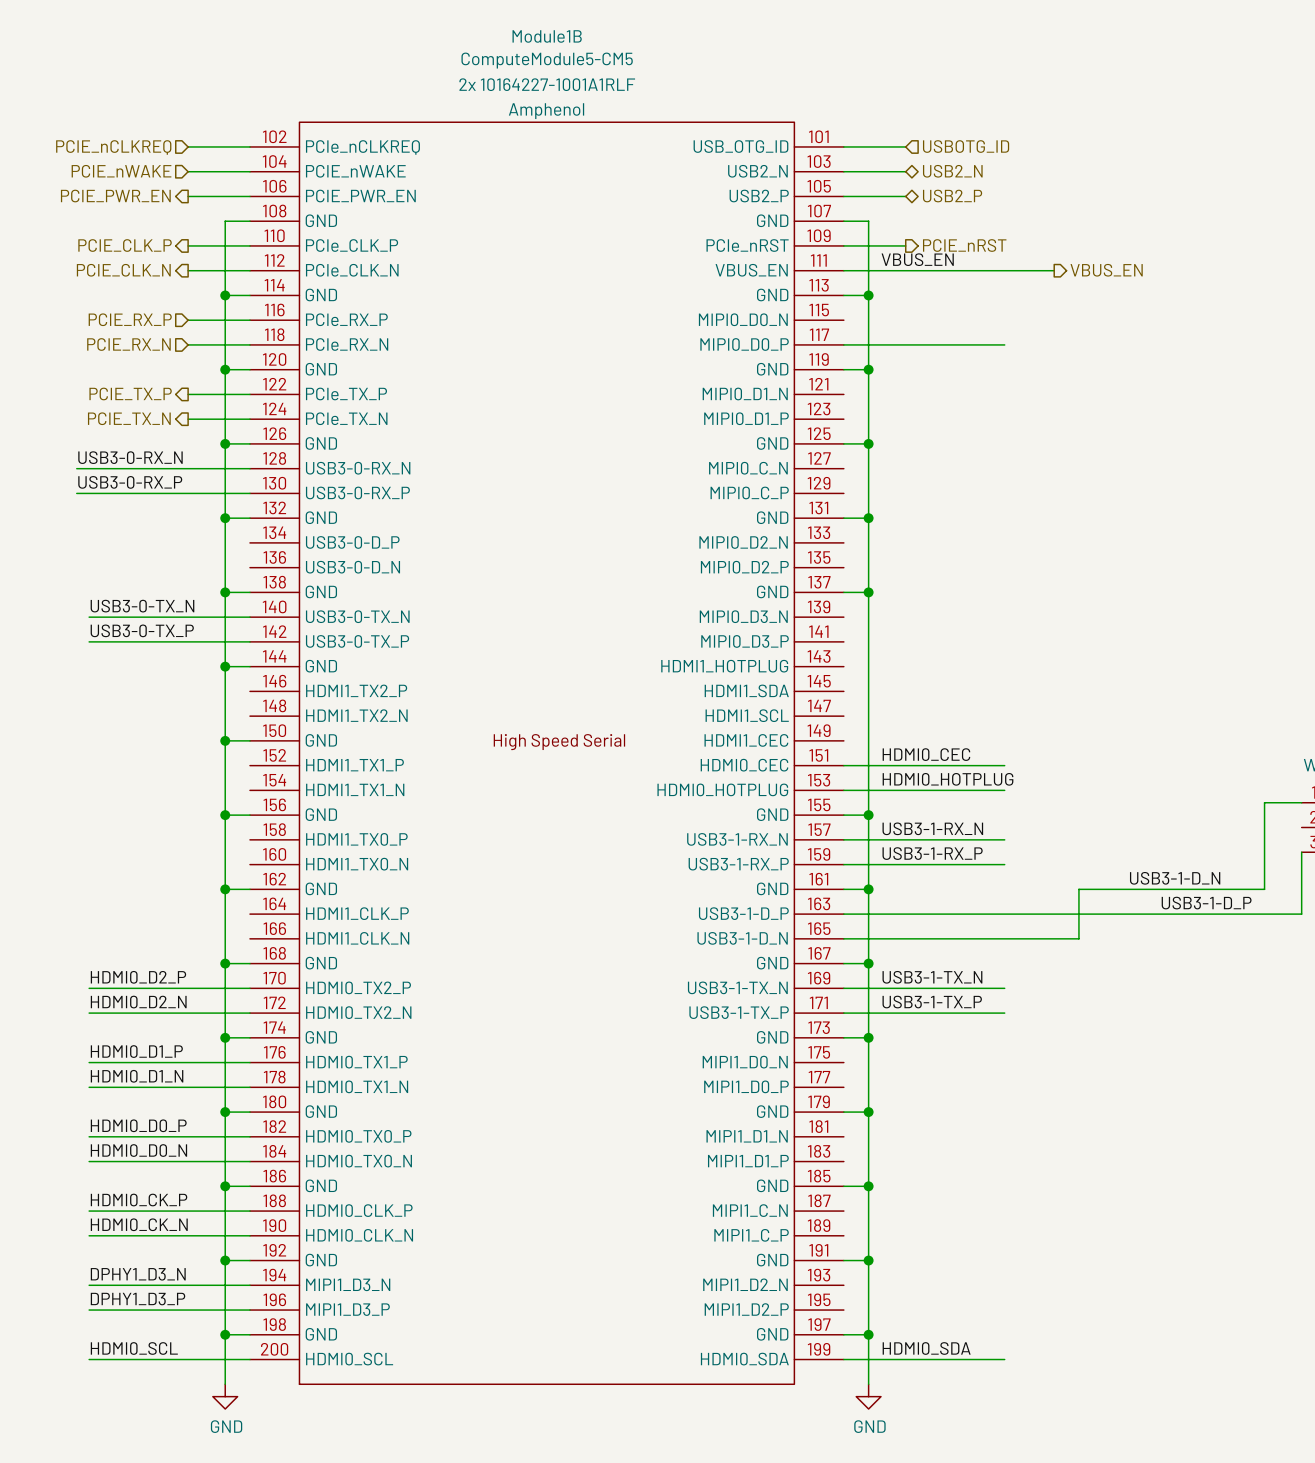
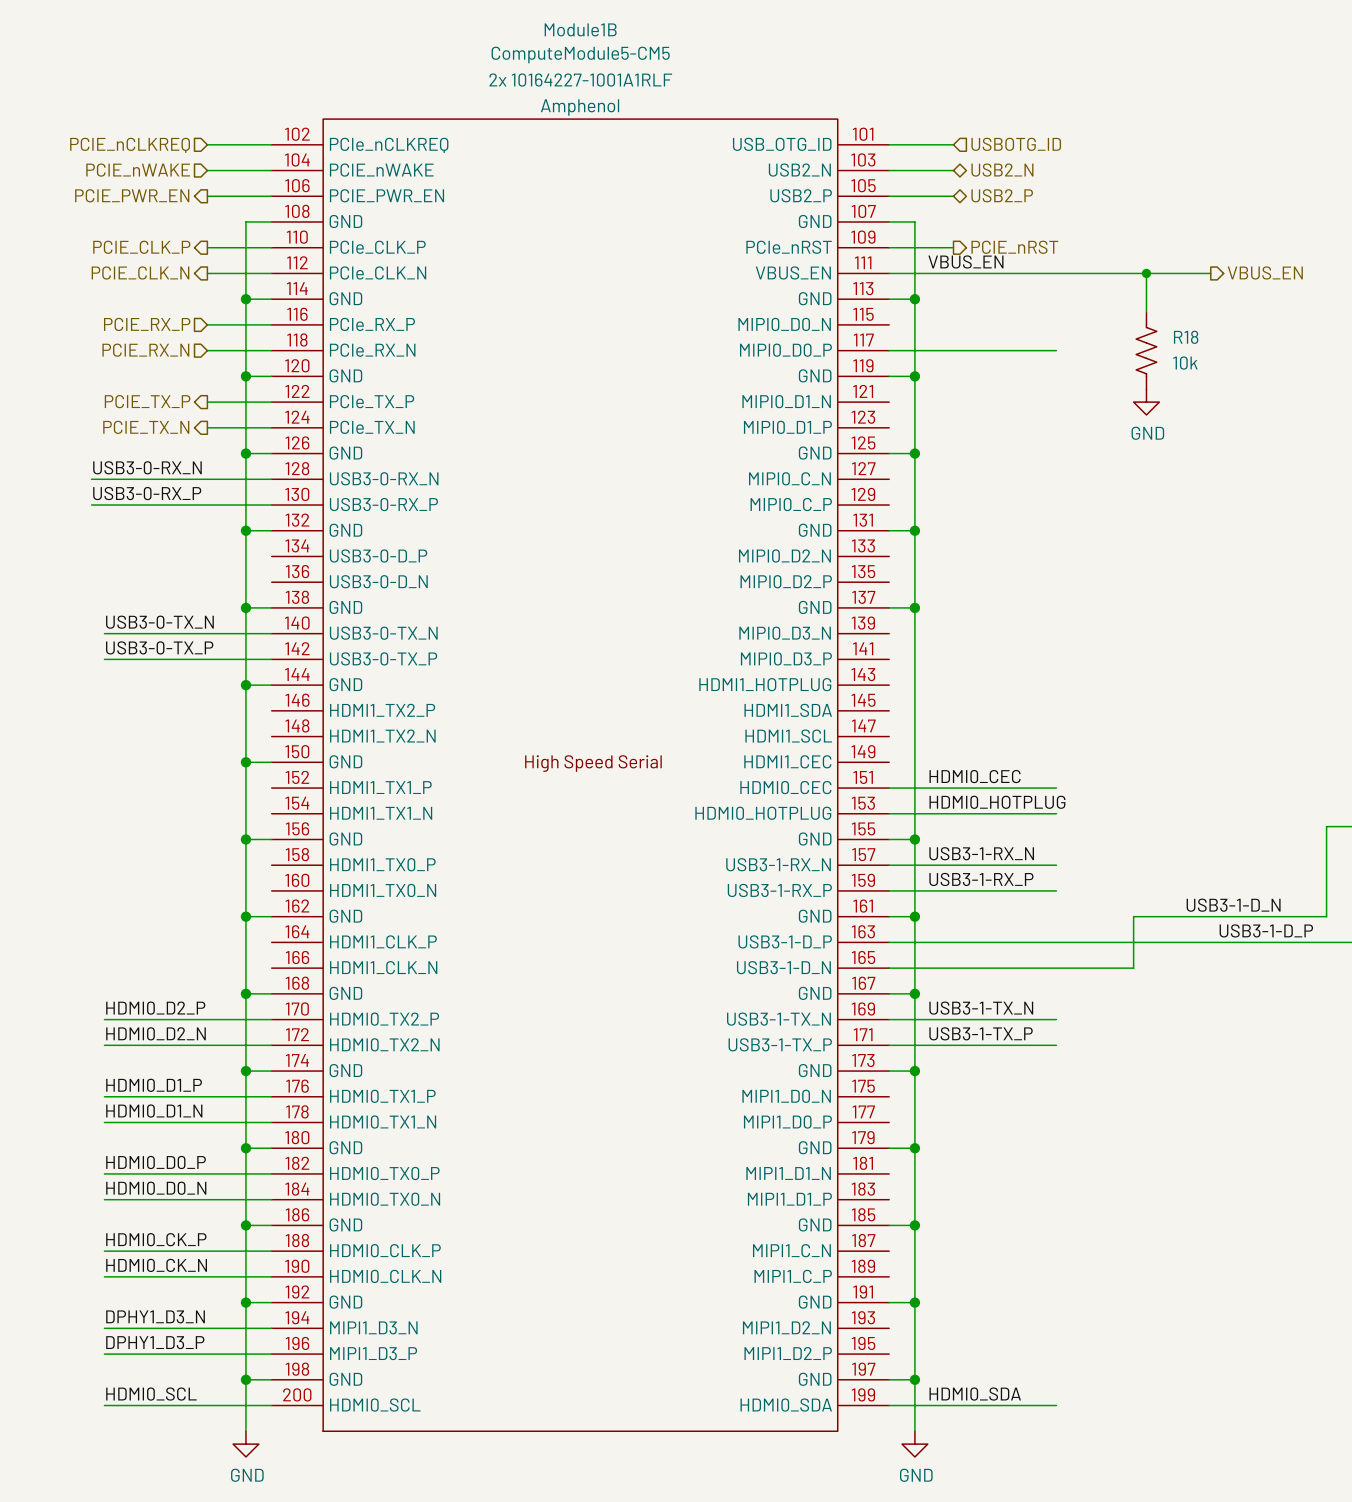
wire: none -> (1107, 273) (1210, 273)
wire: none -> (1146, 273) (1146, 312)
junction: none -> (1146, 273)
hierarchical label position: VBUS_EN (1106, 270) -> VBUS_EN (1265, 272)
R18: none -> 10k (1146, 350)
power symbol: none -> GND (1146, 402)

